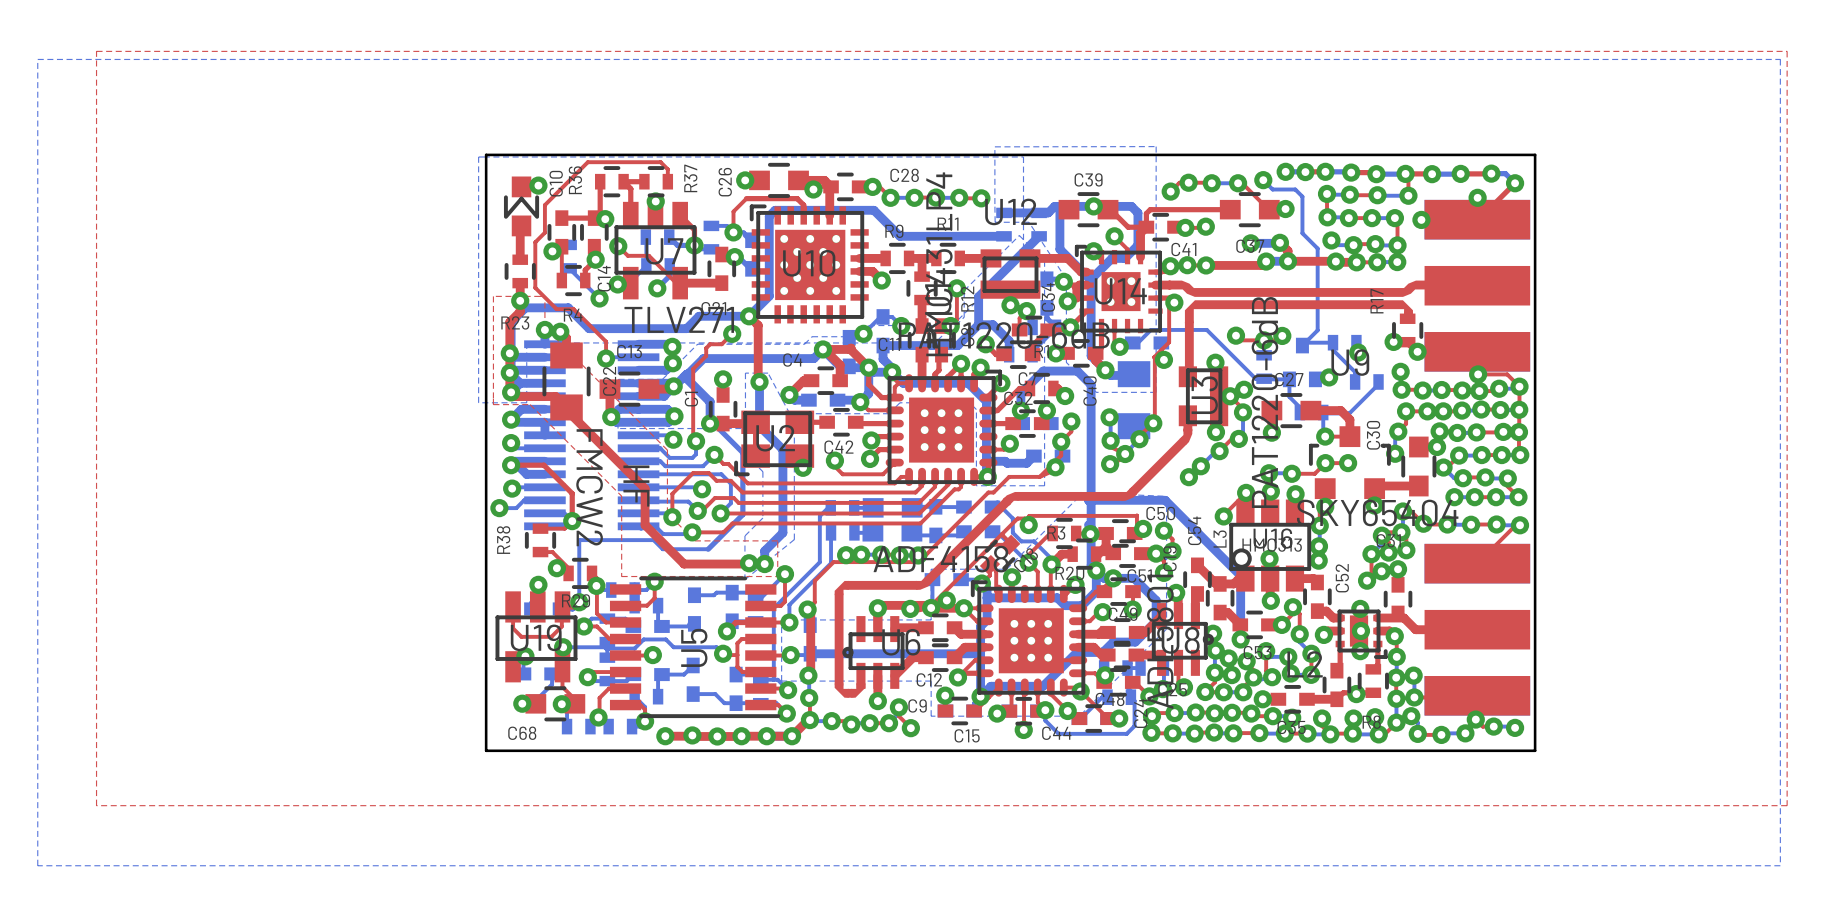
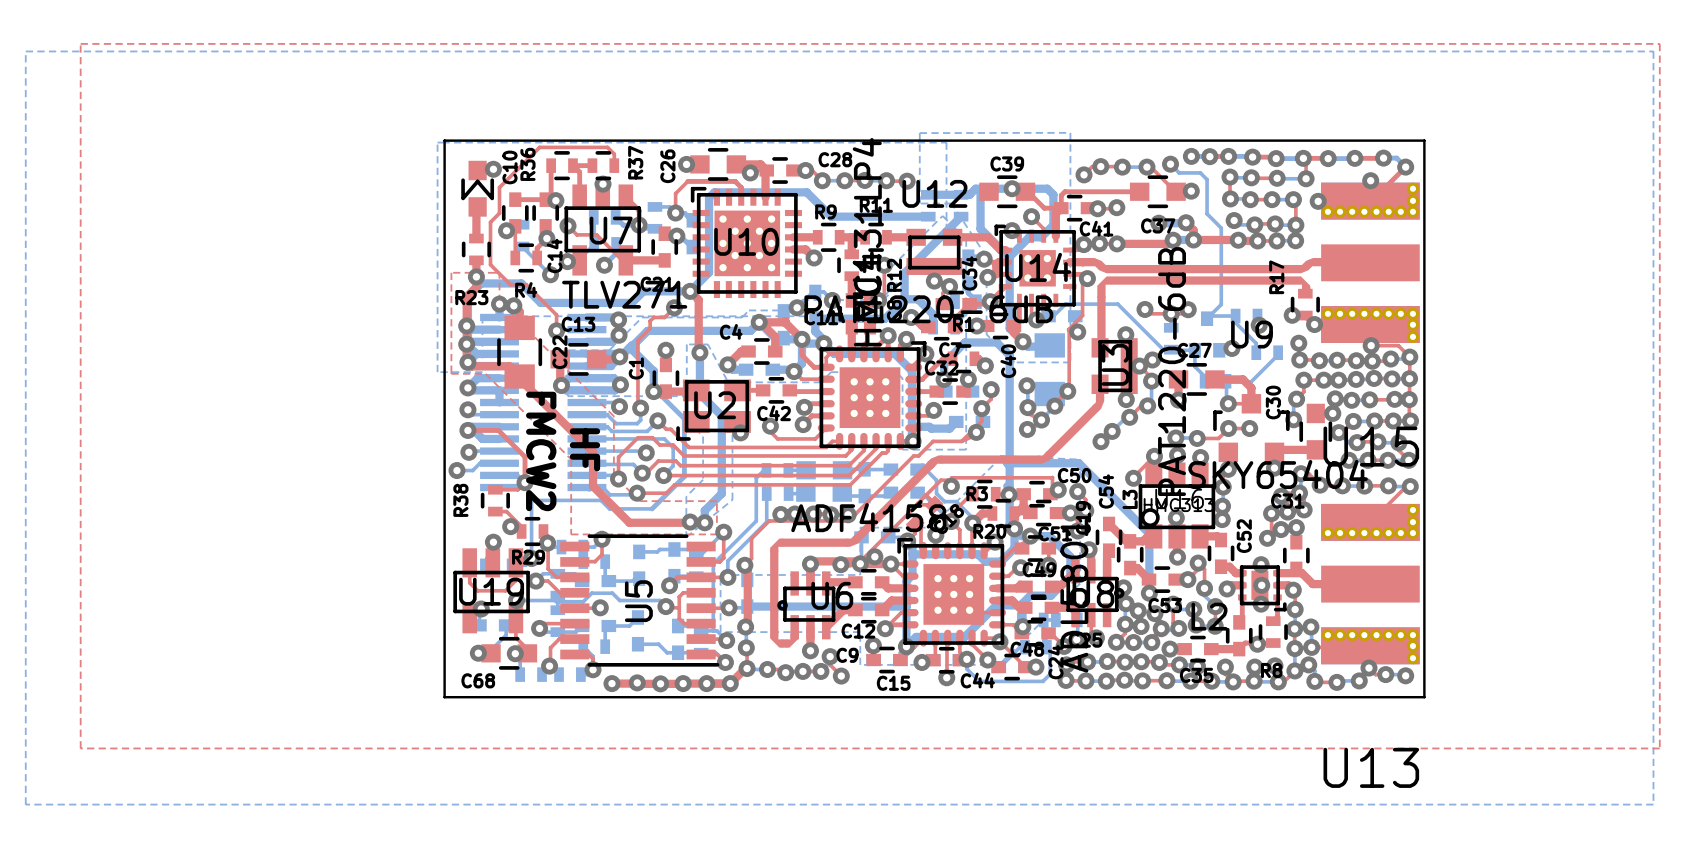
part: (1477, 285) -> none
U15: none -> (1370, 262)
part: (1477, 629) -> none
U13: none -> (1370, 584)

